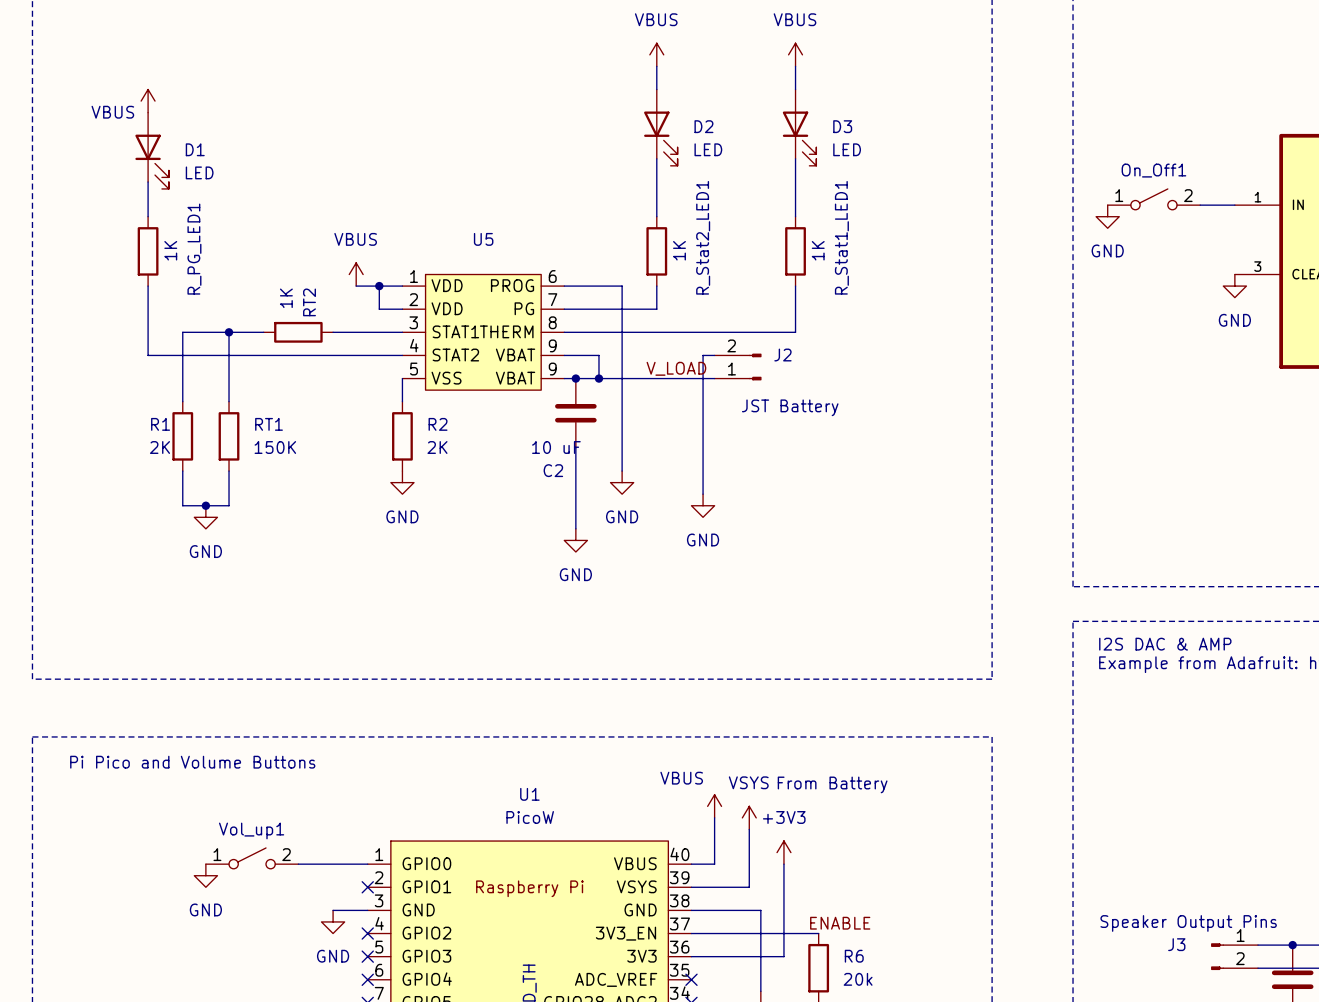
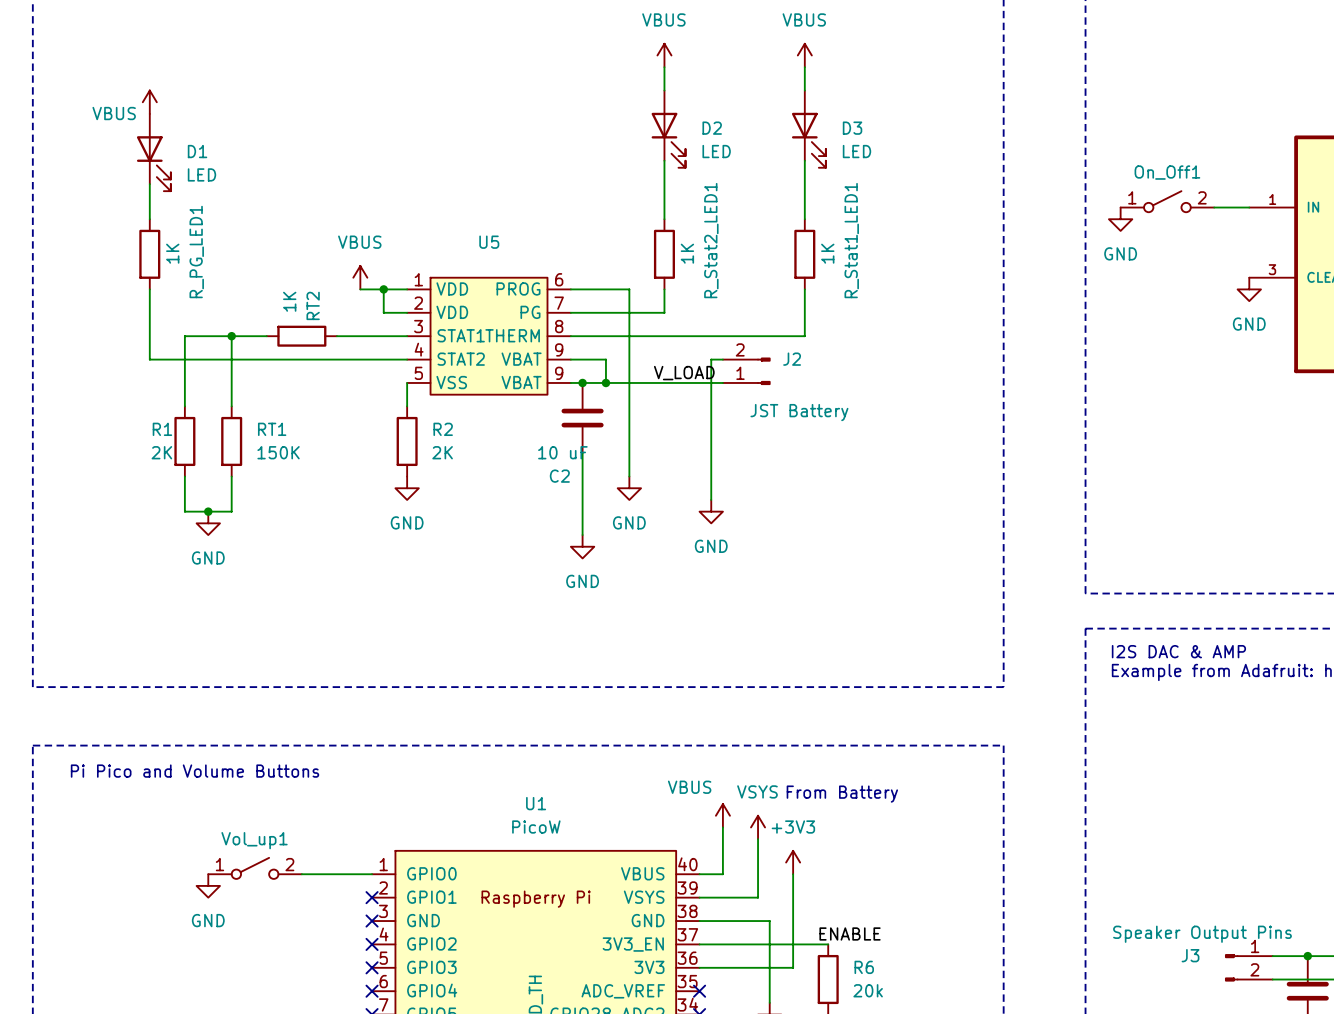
wire: (333, 910) (367, 910) -> none
no-connect mark: none -> (372, 921)
power symbol: GND (333, 921) -> none

